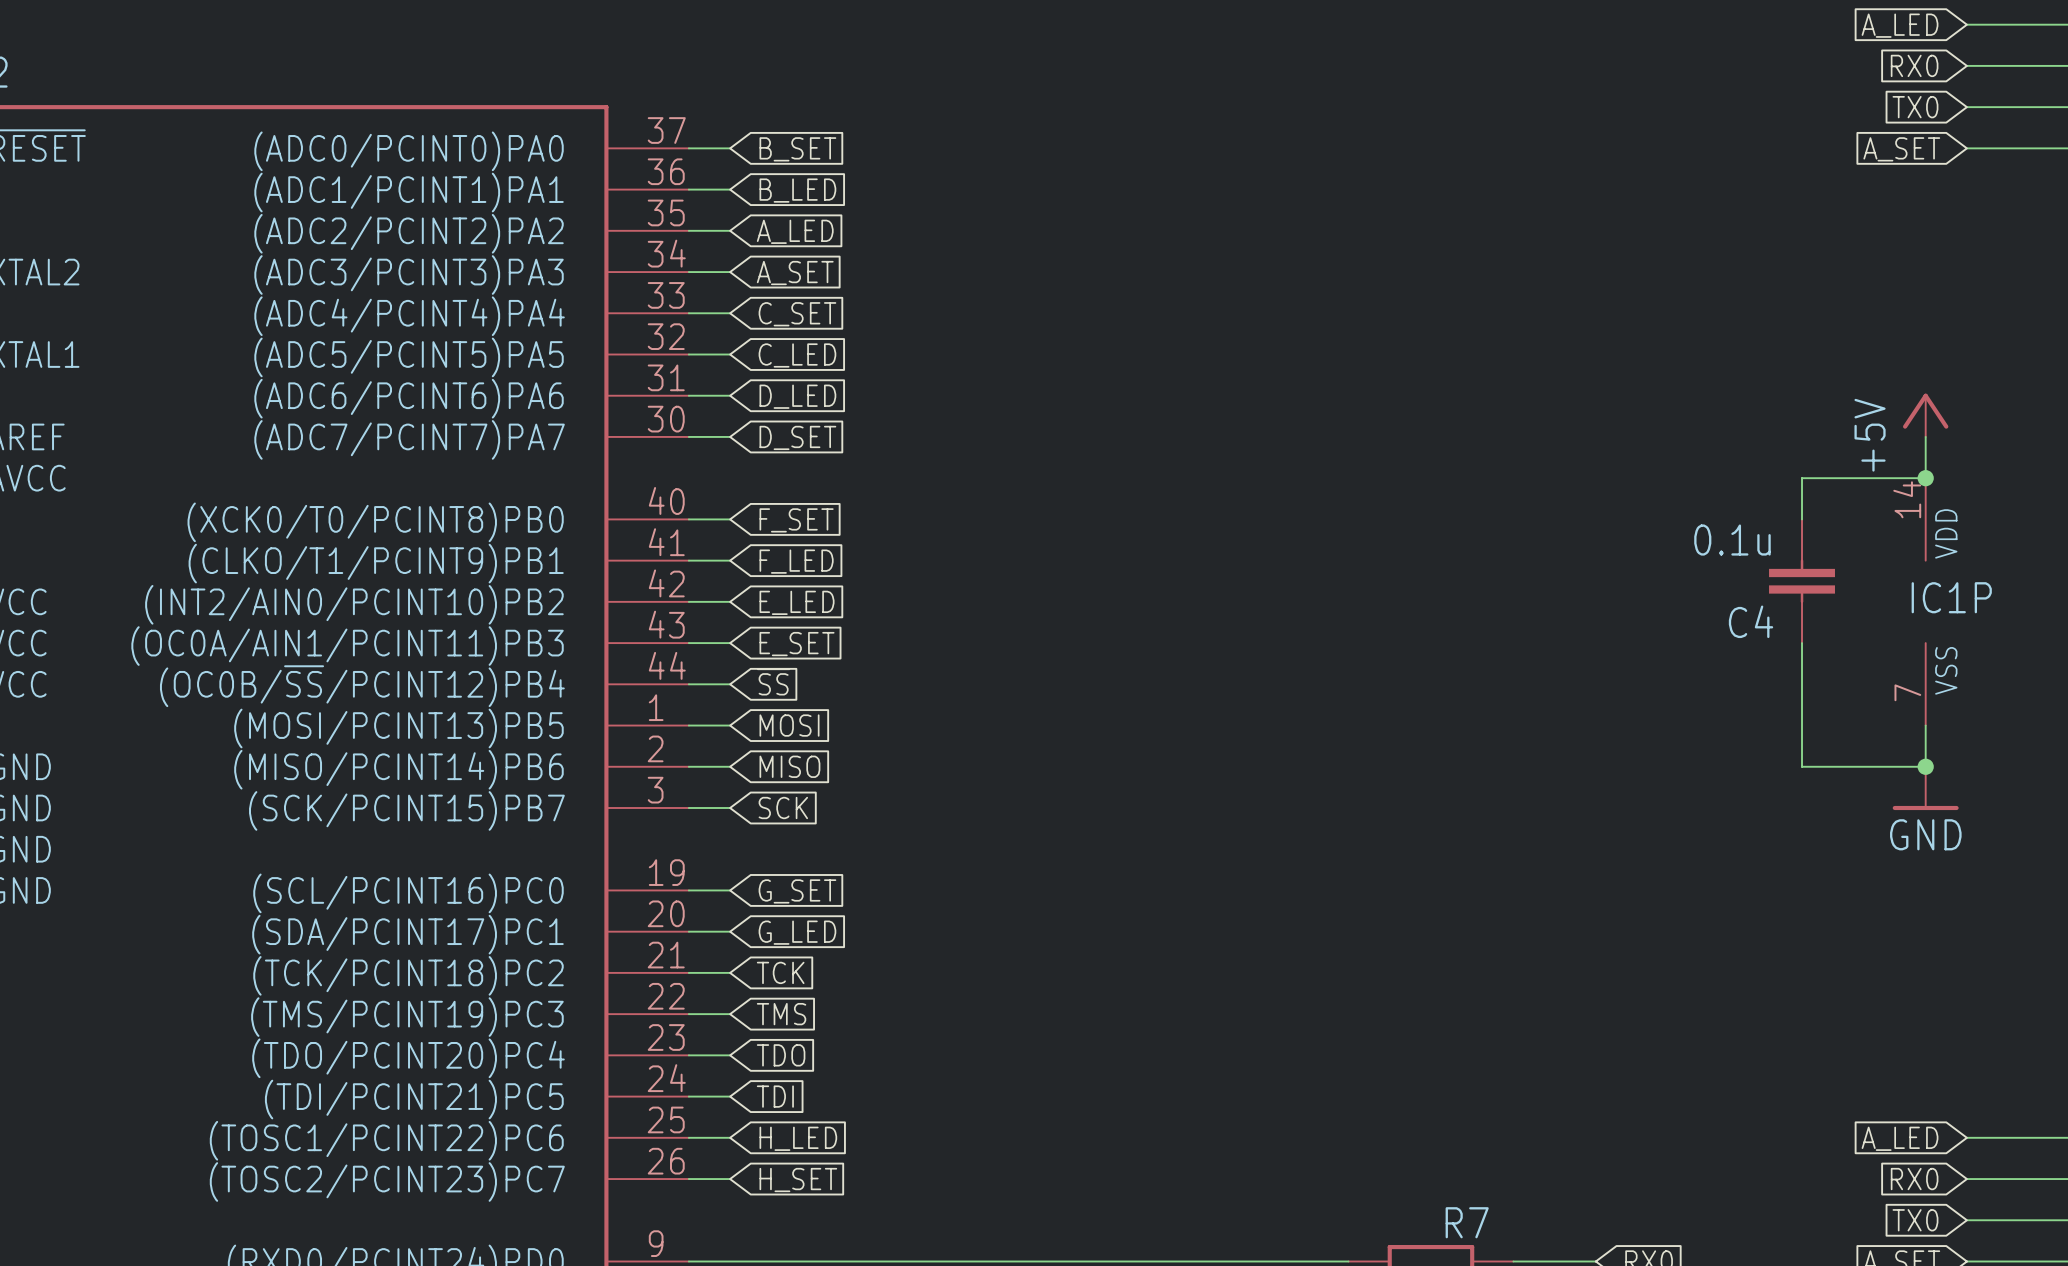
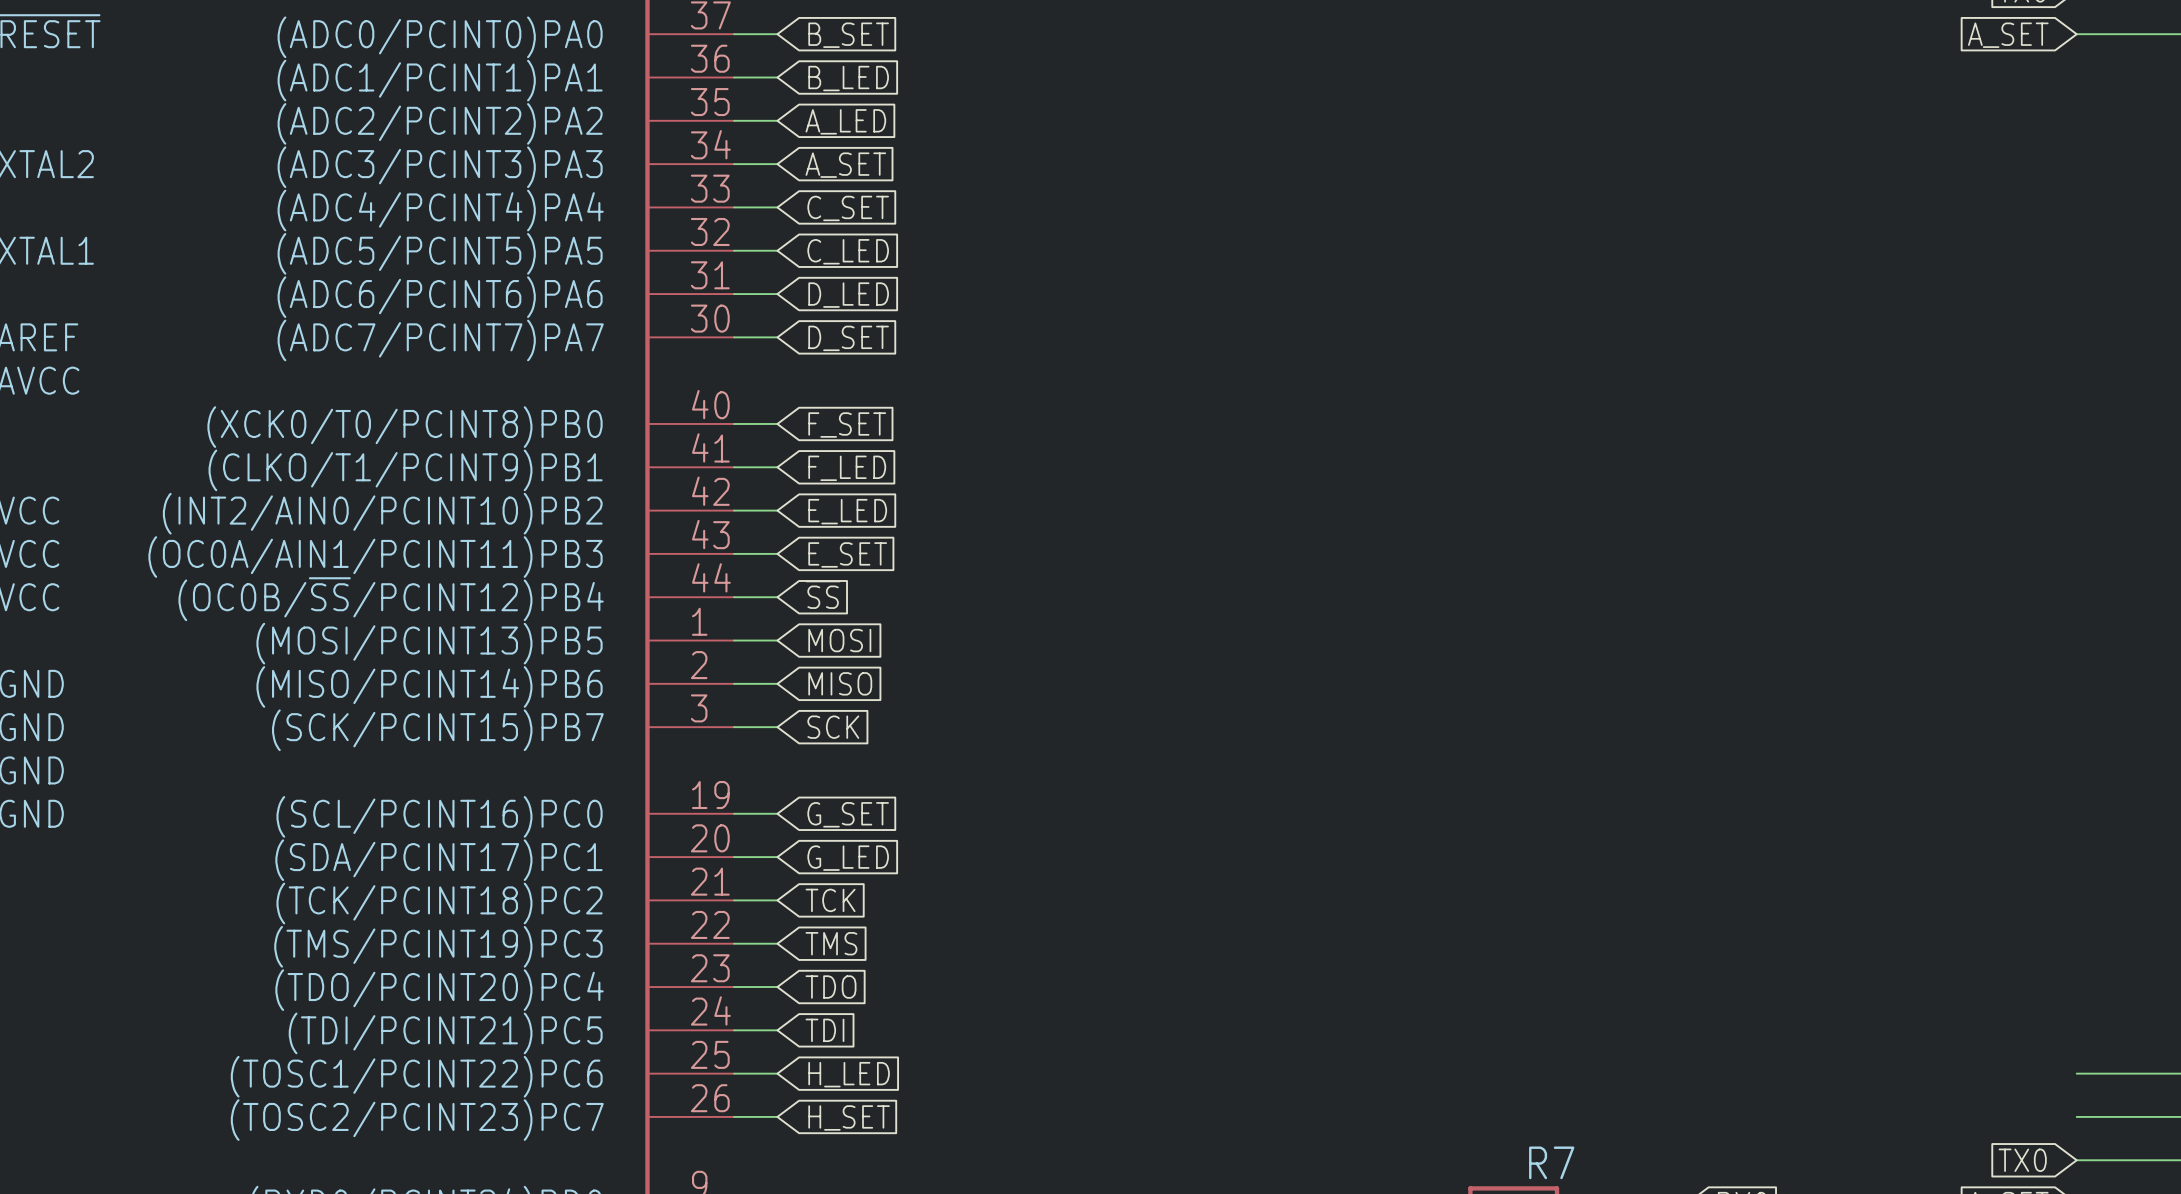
power symbol: +5V (1925, 415) -> none
wire: (1925, 436) (1925, 478) (1802, 478) (1802, 519) -> none
junction: (1925, 478) -> none
C4: 0.1u (1802, 581) -> none
IC1P: (1925, 601) -> none
wire: (1802, 643) (1802, 766) (1925, 766) (1925, 725) -> none
junction: (1925, 766) -> none
power symbol: GND (1925, 788) -> none
global label: A_LED (1900, 1138) -> none
global label: RX0 (1914, 1179) -> none

